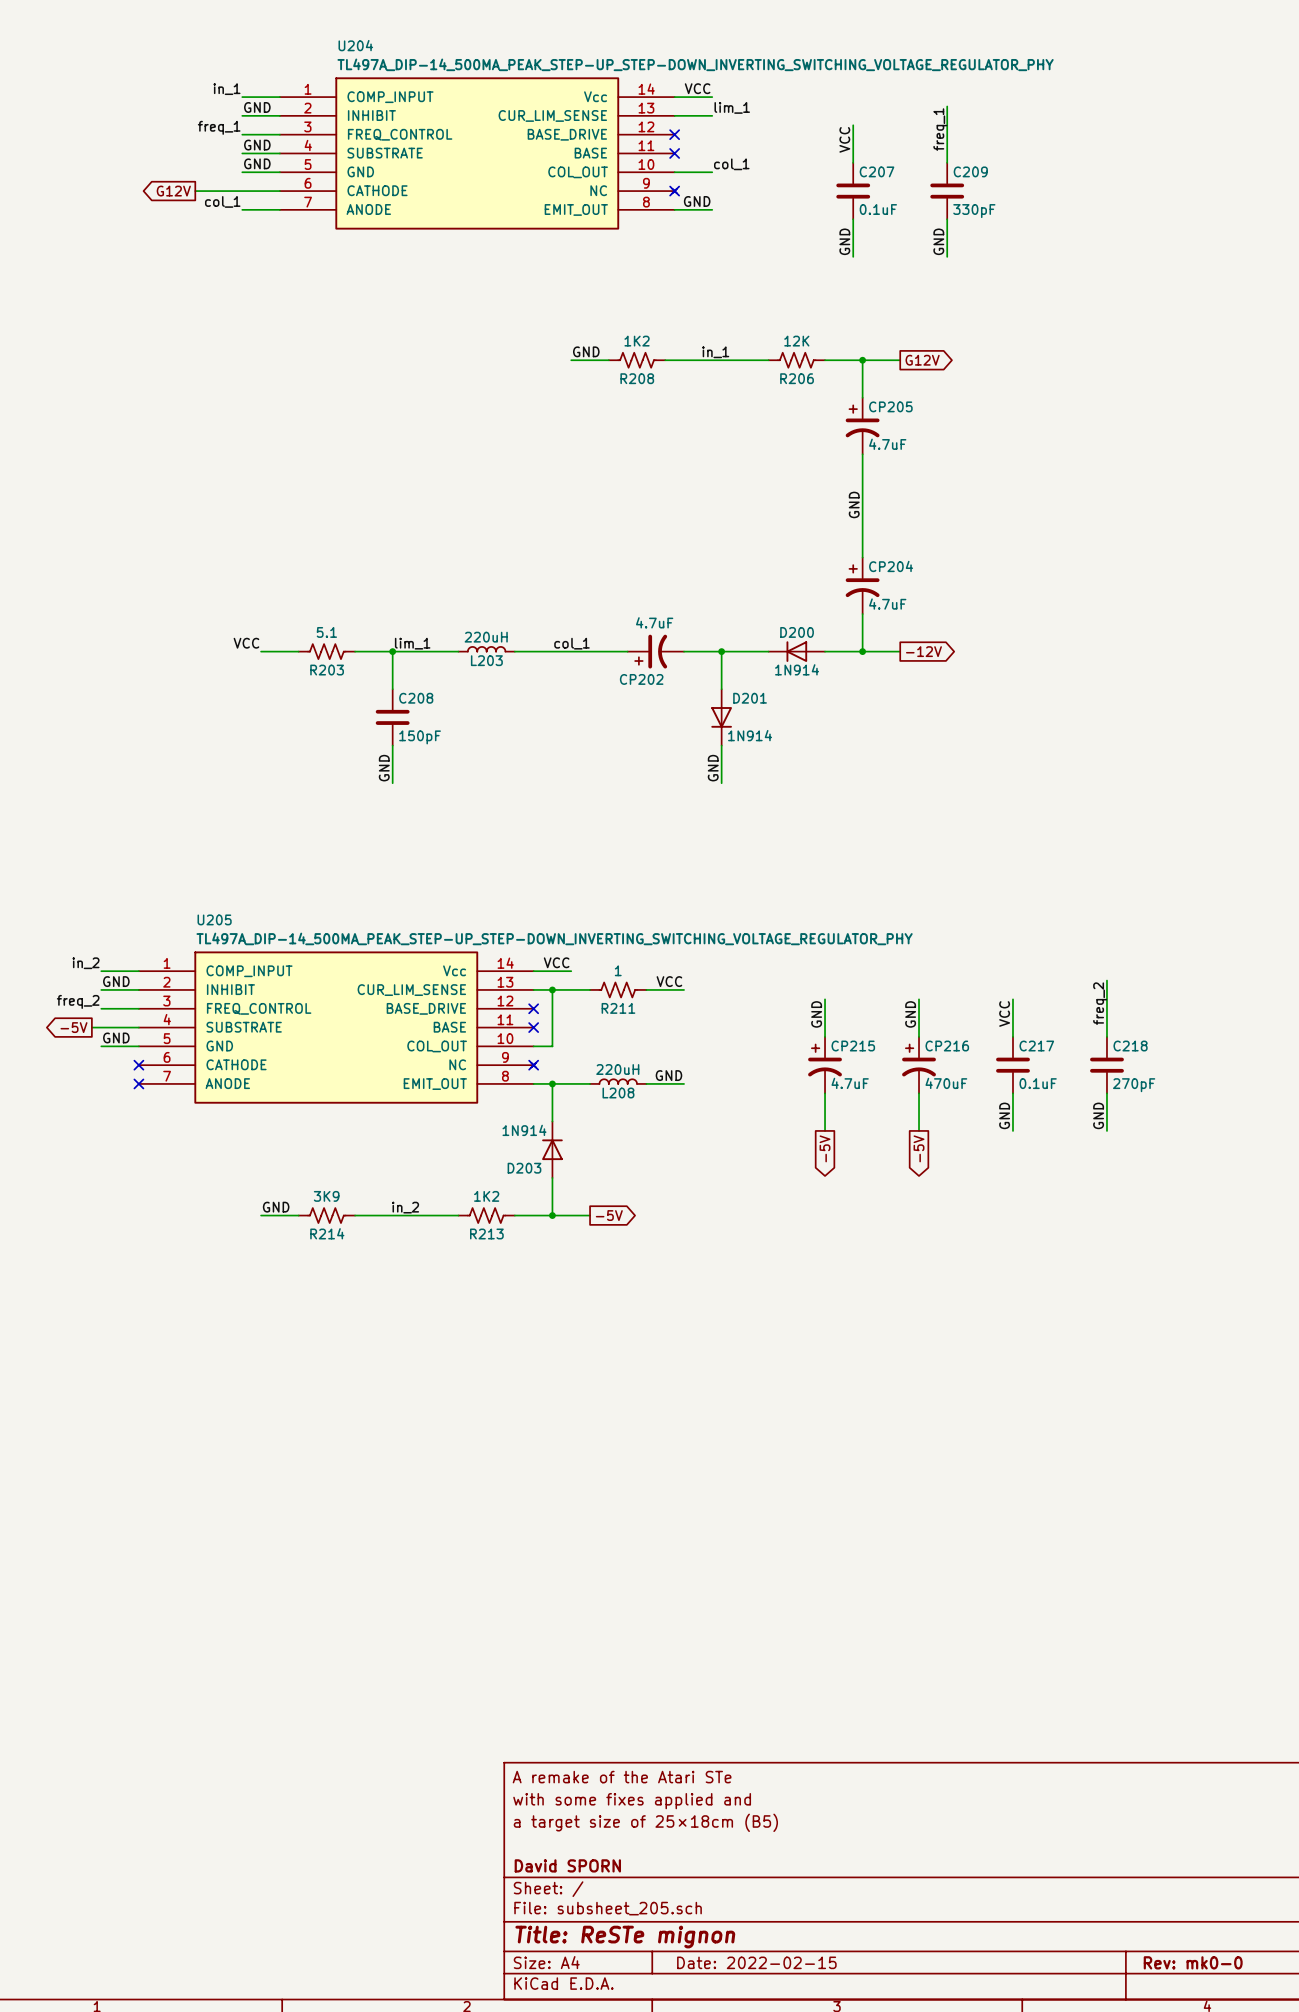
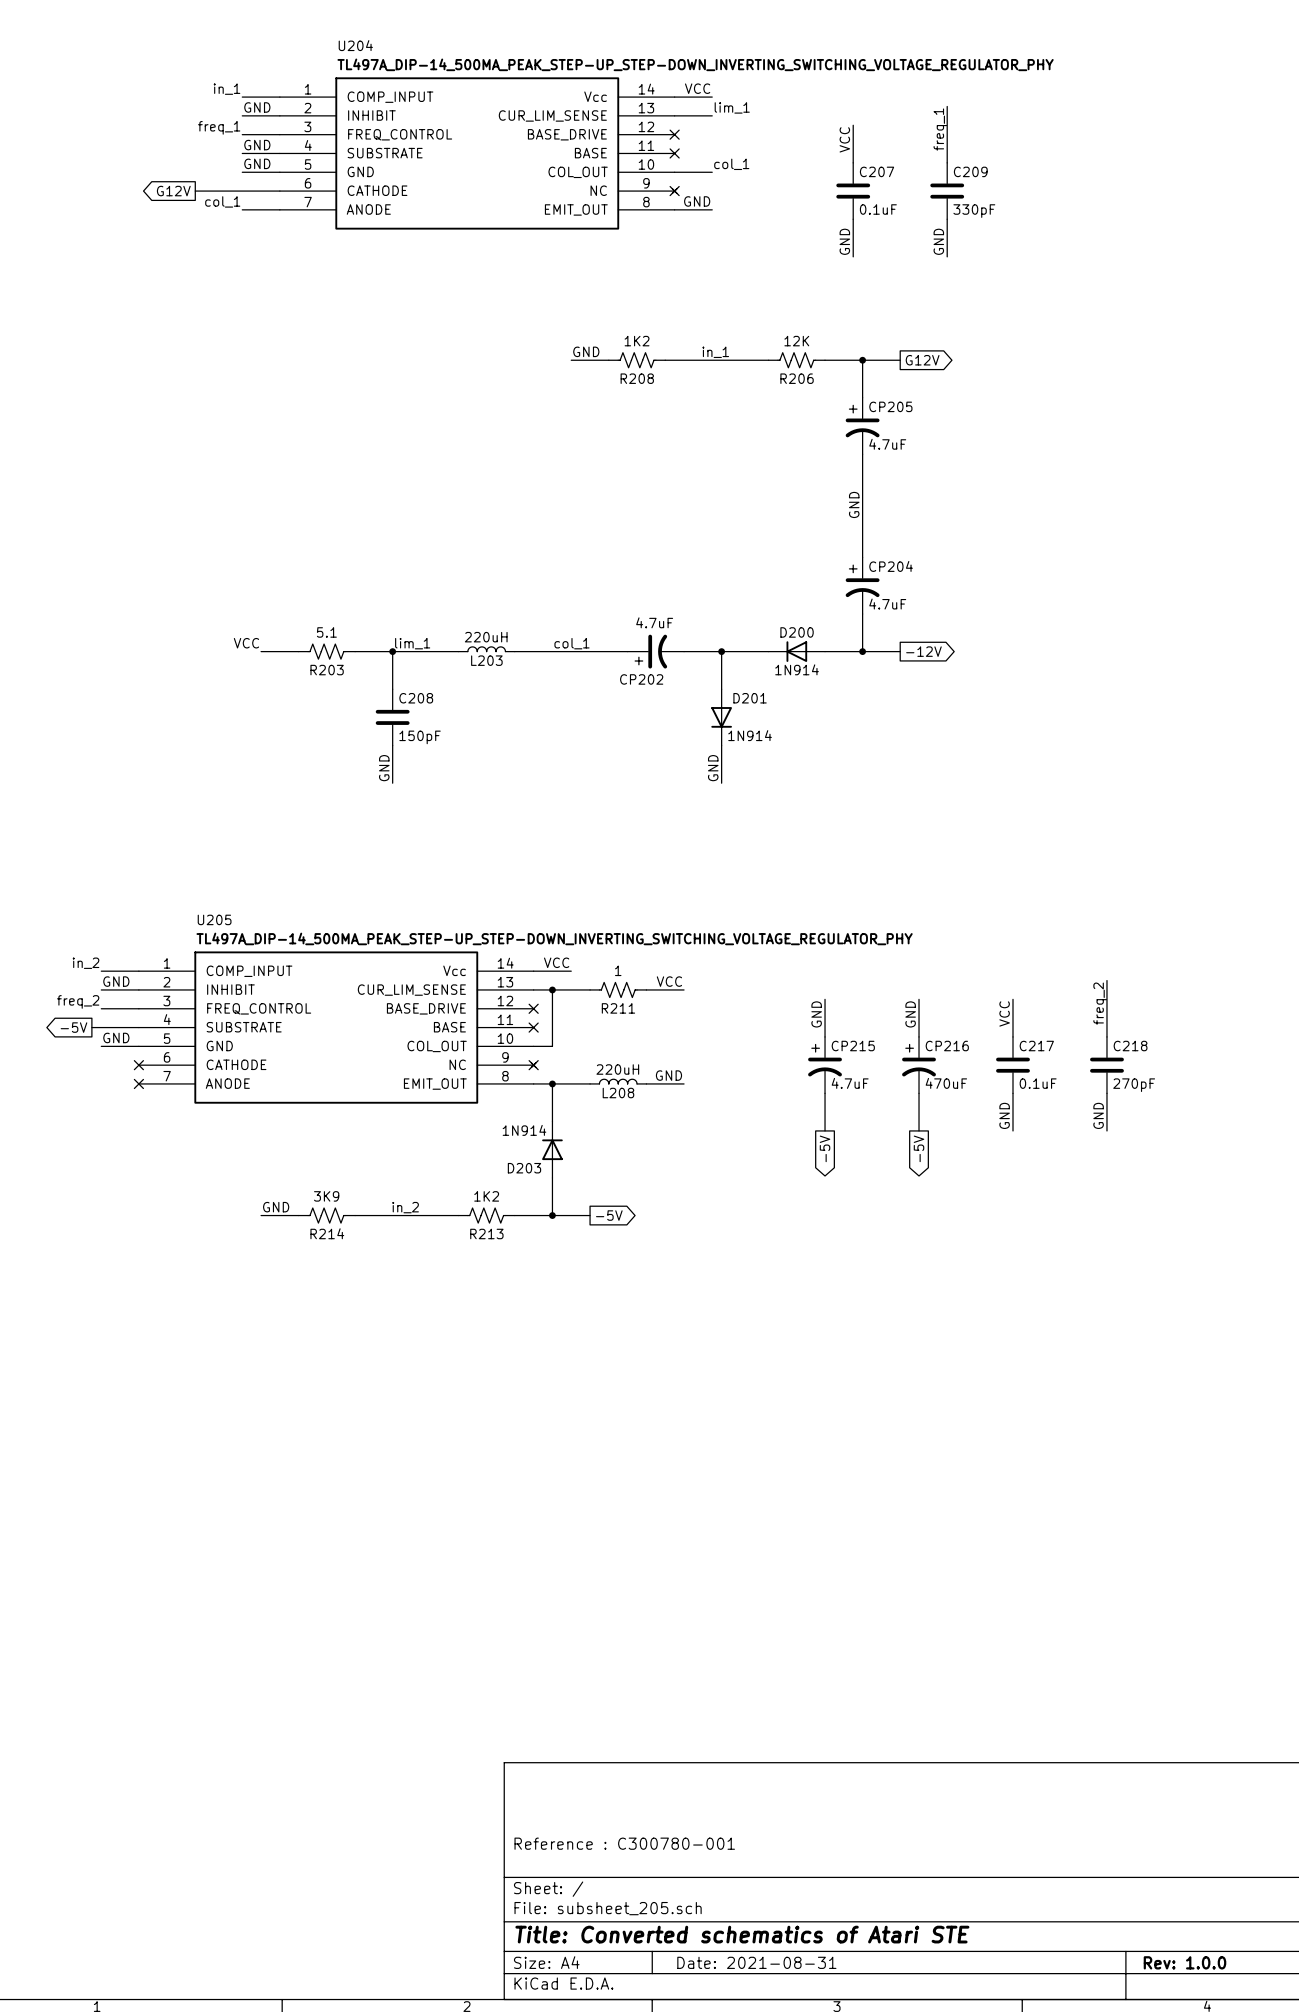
title block: A remake of the Atari STe (622, 1777) -> none
title block: with some fixes applied and (632, 1801) -> none
title block: a target size of 25×18cm (B5) (645, 1822) -> none
title block: none -> Reference : C300780-001 (624, 1843)
title block: David SPORN (567, 1865) -> none
title block: Title: ReSTe mignon (625, 1937) -> Title: Converted schematics of Atari STE (742, 1934)
title block: Date: 2022-02-15 (756, 1962) -> Date: 2021-08-31 (756, 1962)
title block: Rev: mk0-0 (1193, 1962) -> Rev: 1.0.0 (1184, 1962)

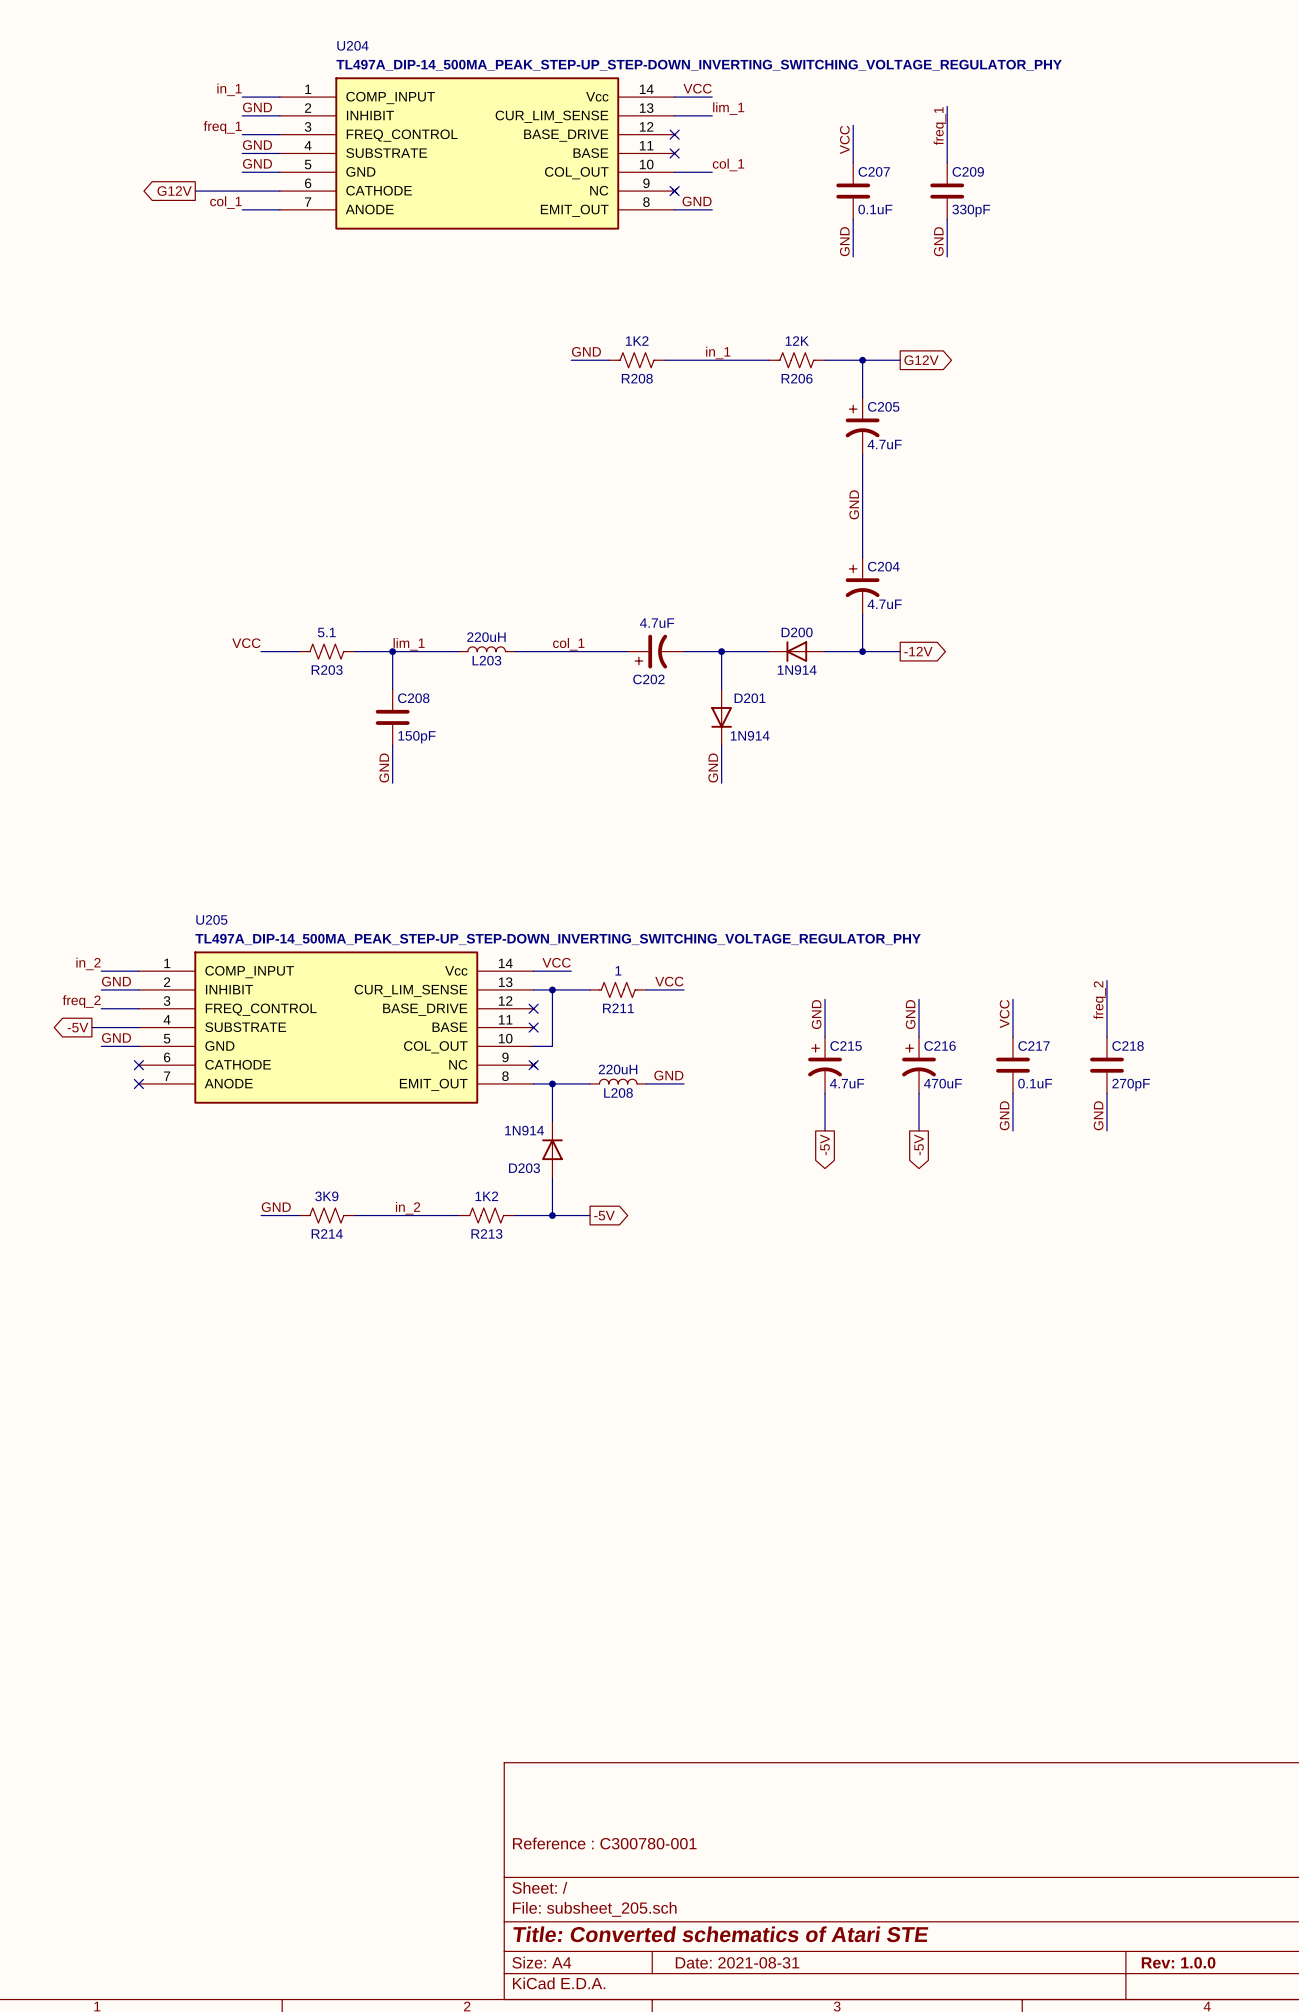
CP205 name: CP205 (890, 406) -> C205 (883, 406)
CP204 name: CP204 (891, 566) -> C204 (883, 566)
CP202 name: CP202 (641, 679) -> C202 (648, 679)
CP215 name: CP215 (853, 1046) -> C215 (846, 1046)
CP216 name: CP216 (947, 1046) -> C216 (940, 1046)

